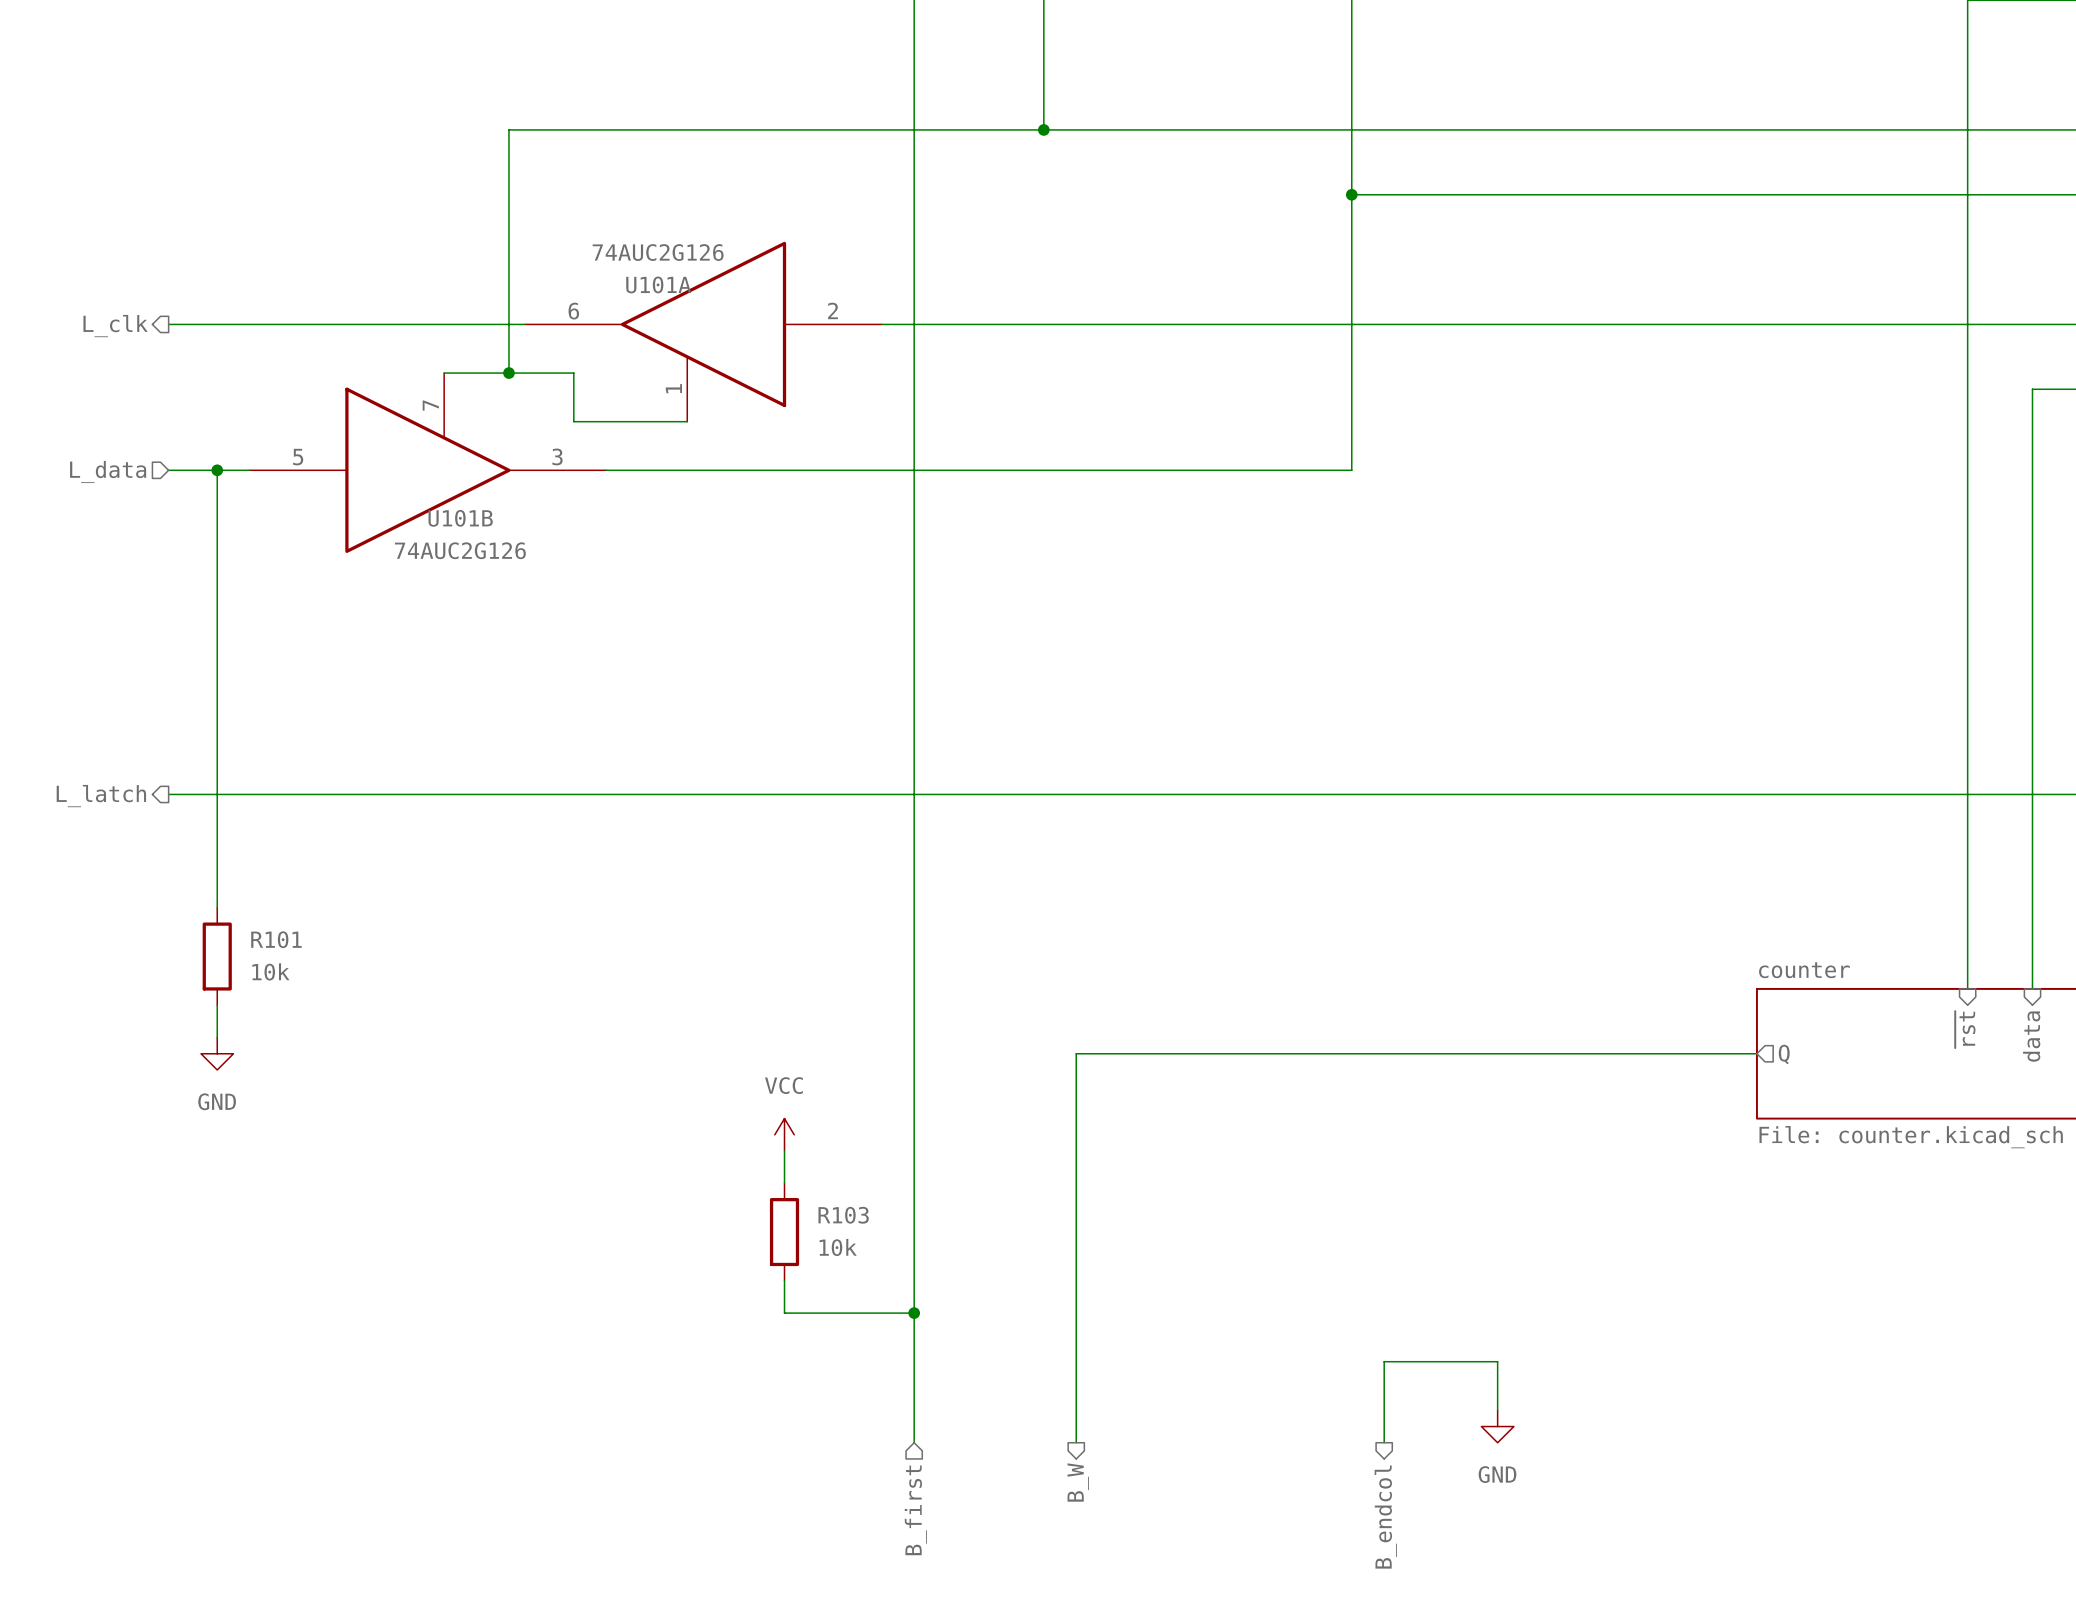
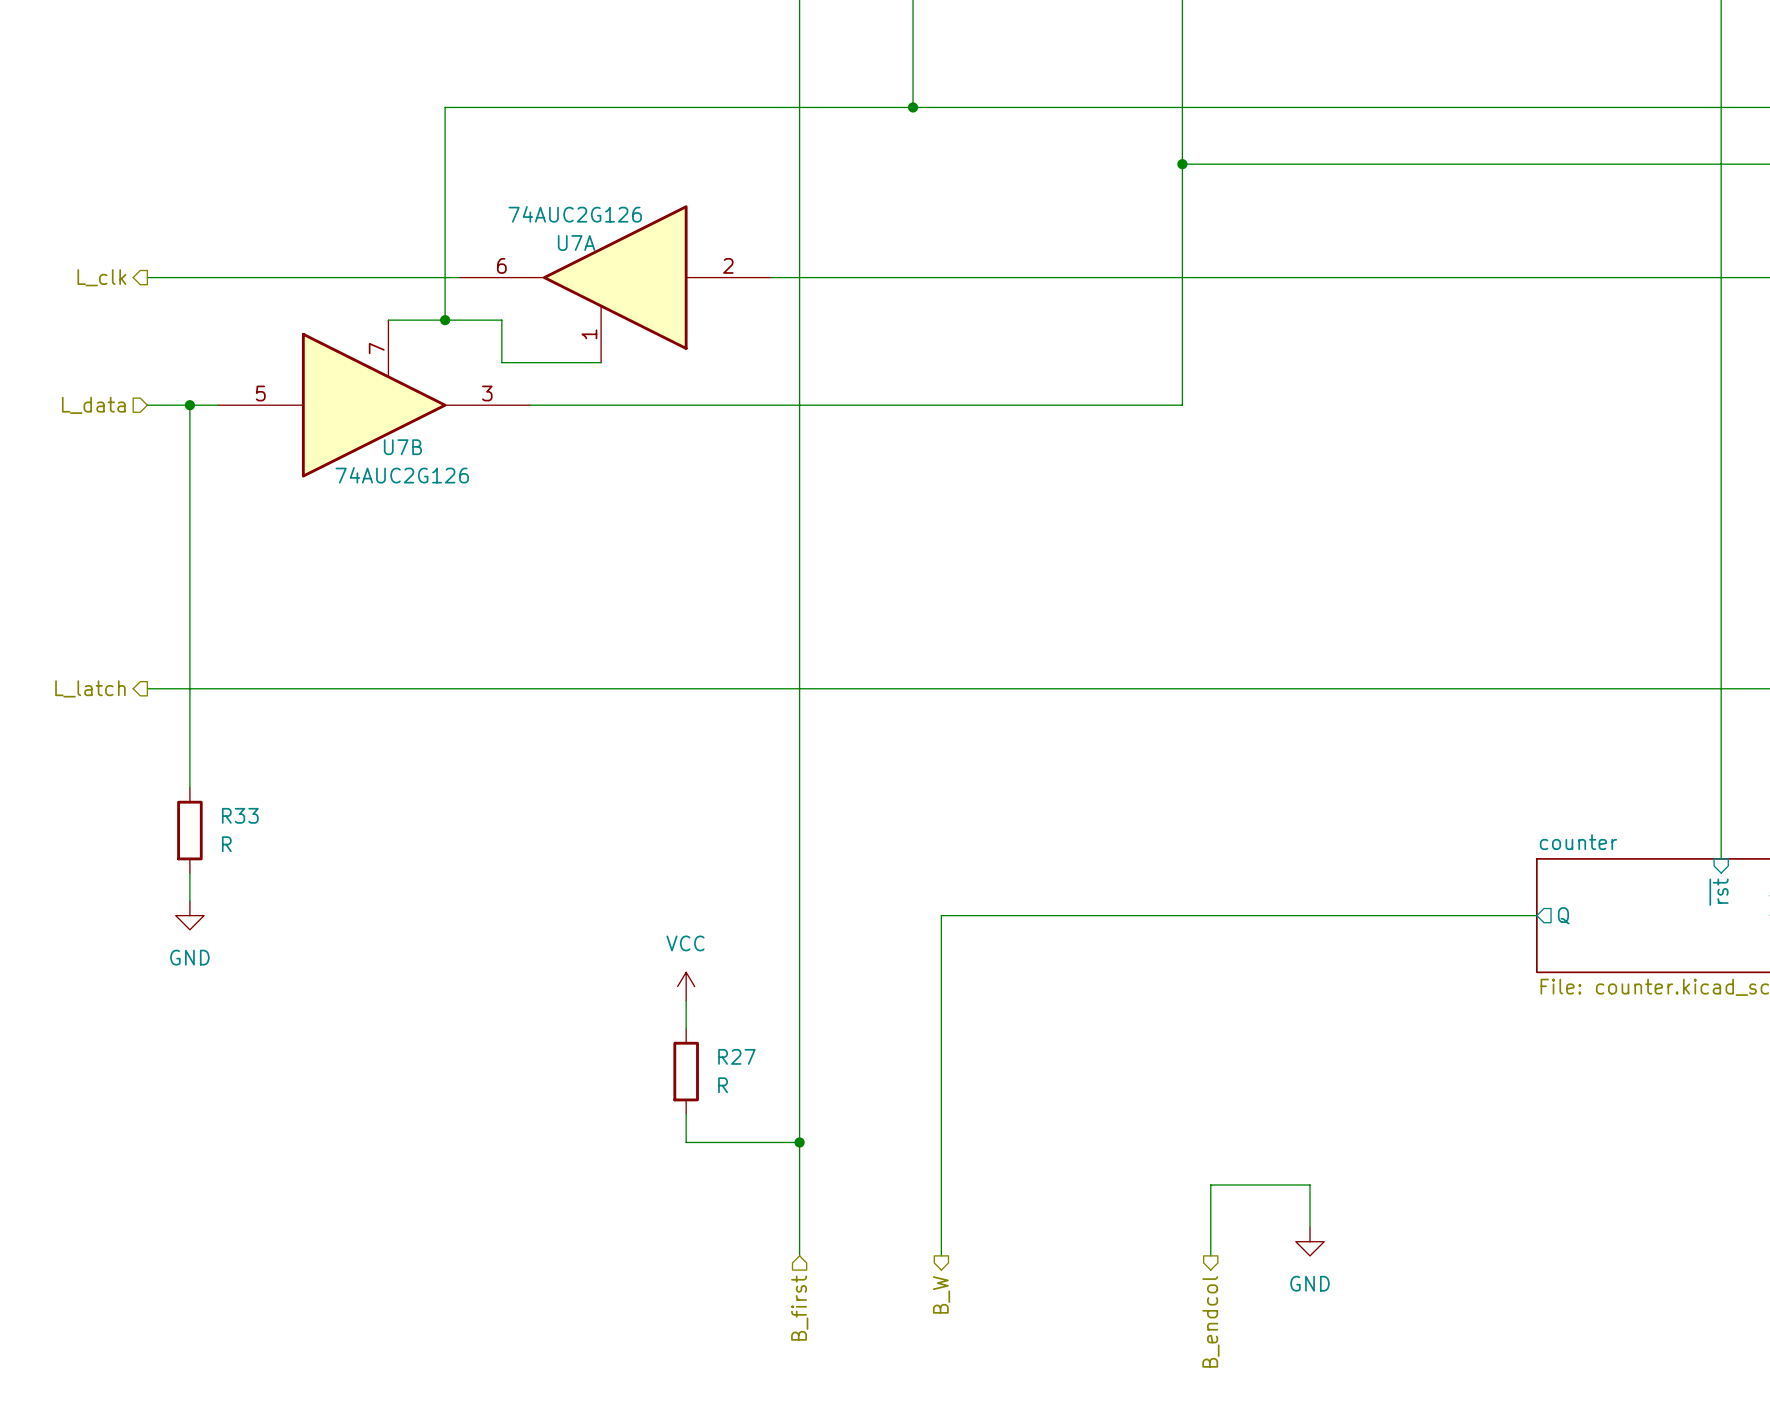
U101A name: U101A (658, 284) -> U7A (576, 243)
U101B name: U101B (460, 518) -> U7B (402, 447)
R101 name: R101 (276, 939) -> R33 (240, 815)
R101 value: 10k (270, 971) -> R (226, 844)
R103 name: R103 (843, 1215) -> R27 (736, 1056)
R103 value: 10k (838, 1247) -> R (723, 1085)

